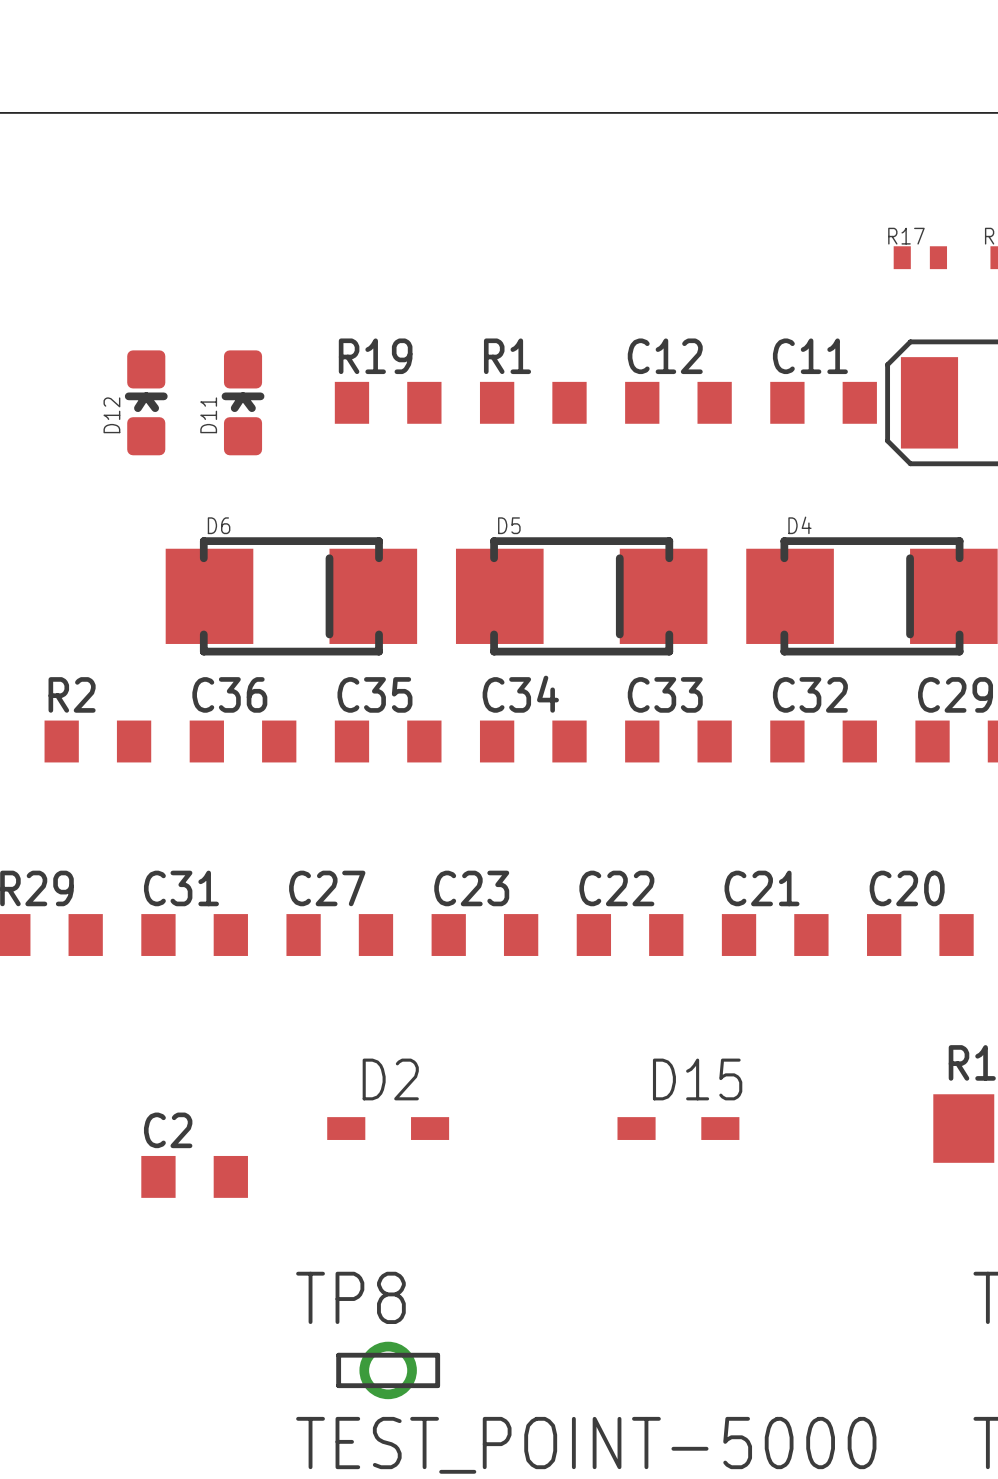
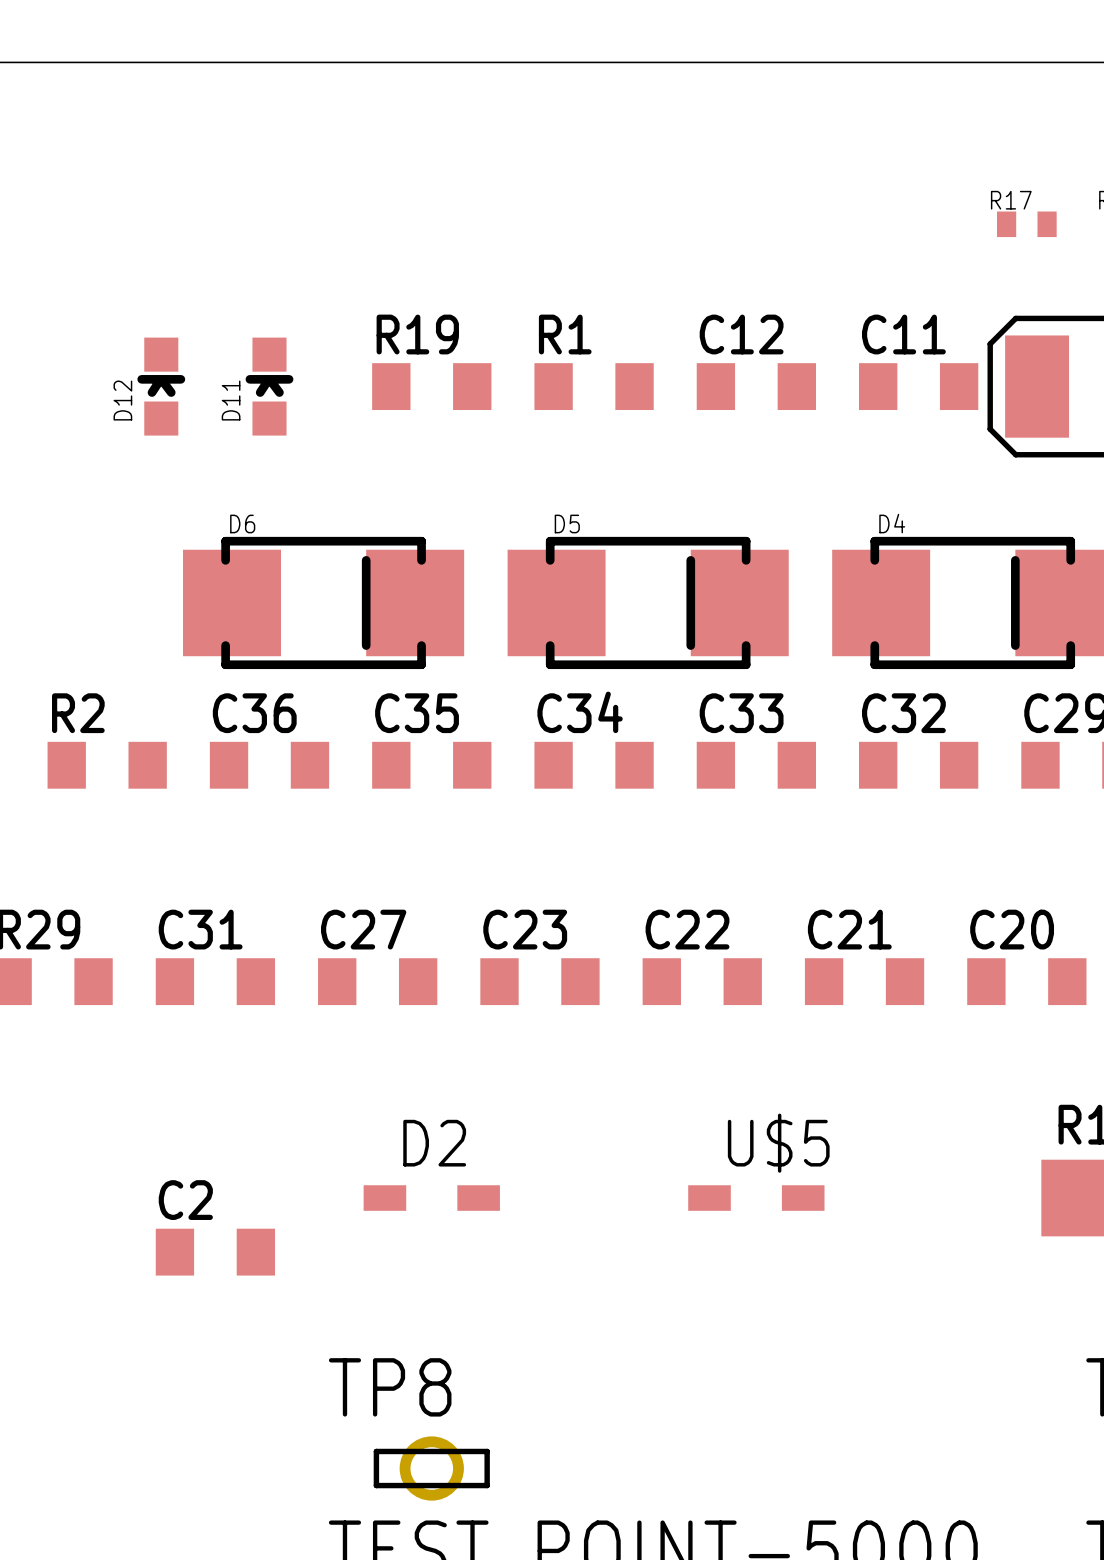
D12 footprint: [124, 350, 168, 456] -> [137, 337, 186, 436]
D11 footprint: [221, 350, 265, 456] -> [245, 337, 294, 436]
D15 name: D15 (697, 1079) -> U$5 (778, 1143)

